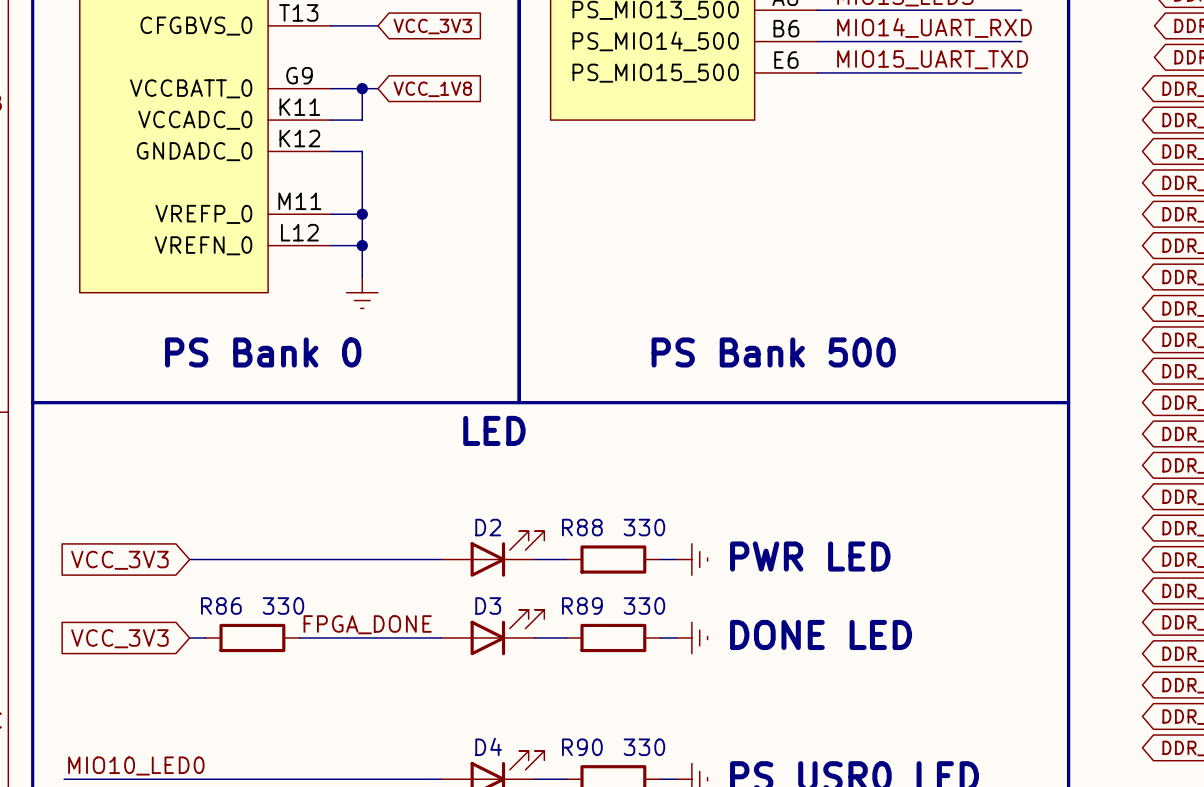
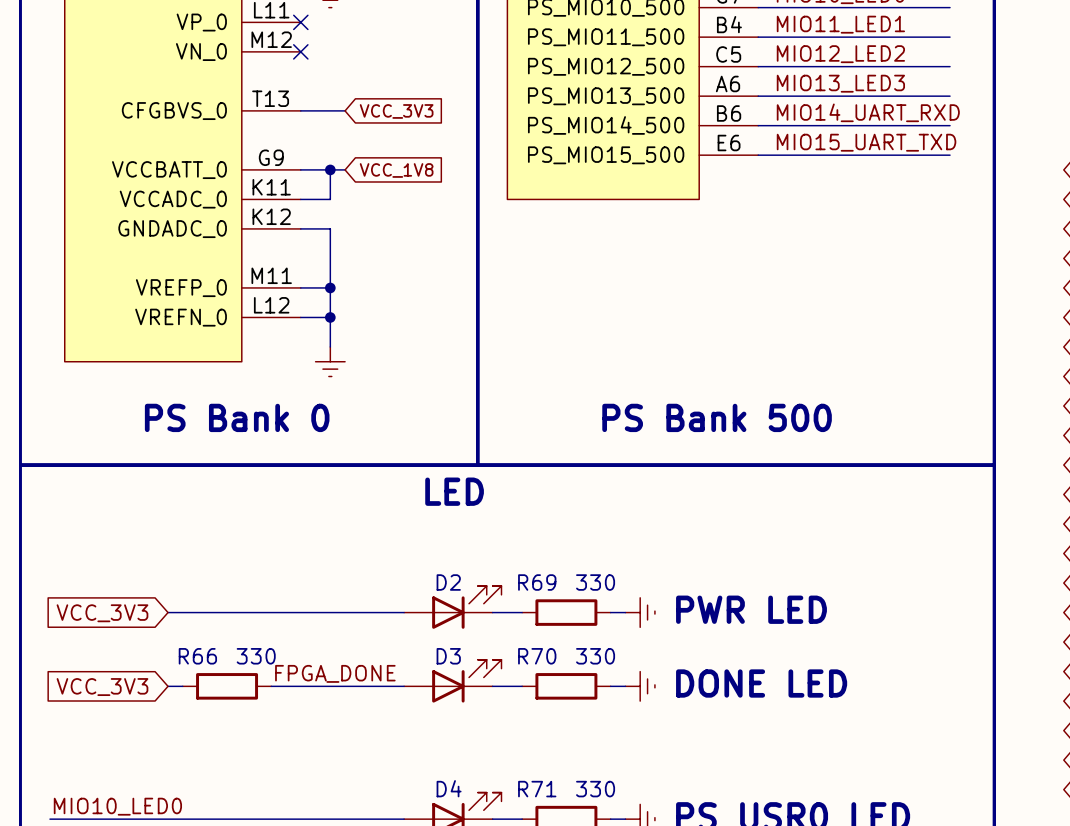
R88 name: R88 (582, 527) -> R69 (537, 582)
R86 name: R86 (221, 606) -> R66 (197, 656)
R89 name: R89 (582, 606) -> R70 (537, 656)
R90 name: R90 (582, 747) -> R71 (537, 789)

